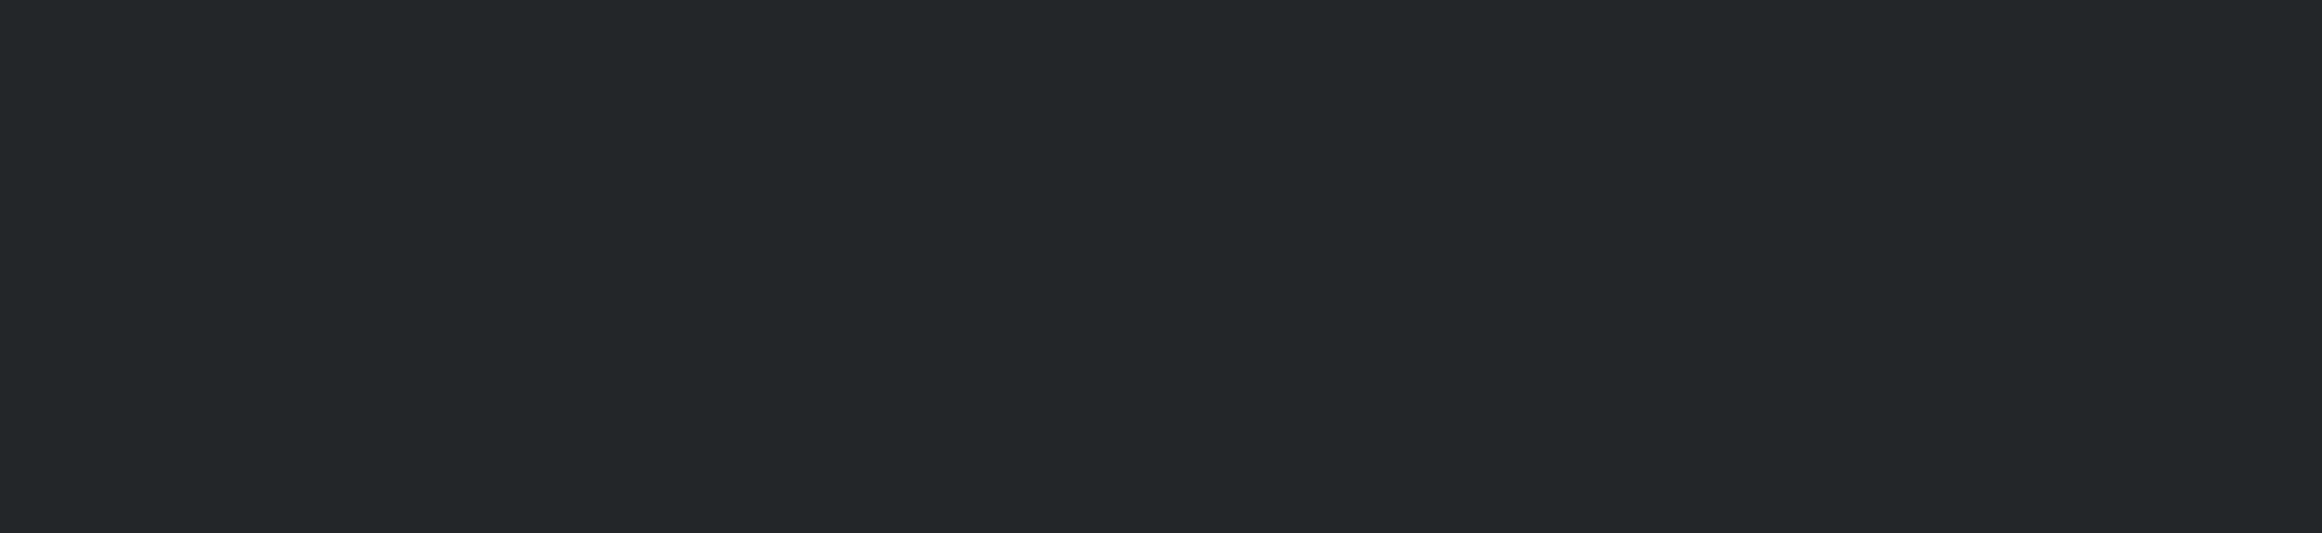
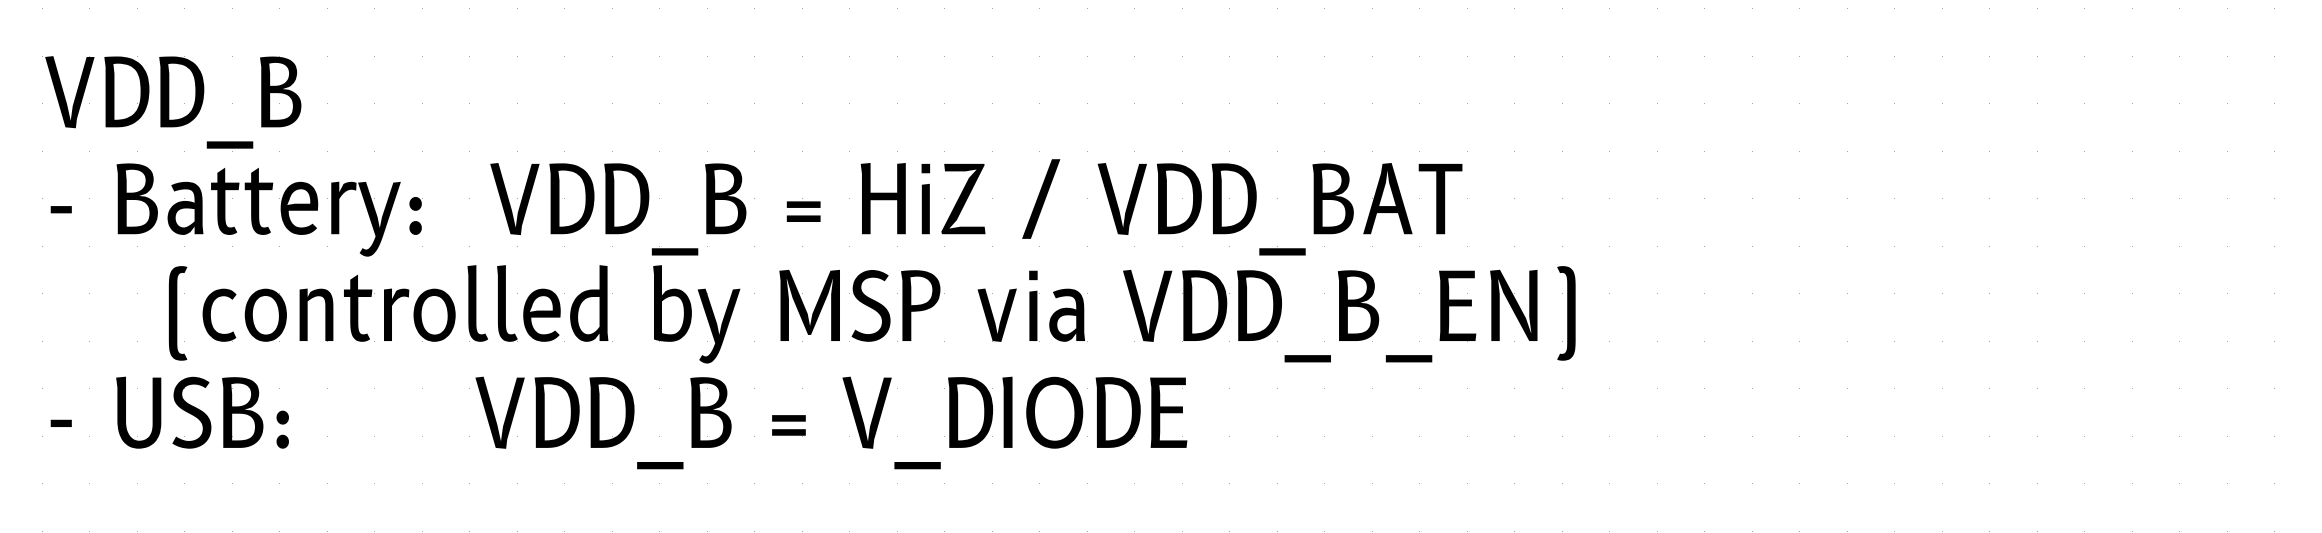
text: none -> VDD_B (173, 102)
text: none -> - Battery: VDD_B = HiZ / VDD_BAT (756, 207)
text: none -> (controlled by MSP via VDD_B_EN) (872, 314)
text: none -> - USB: VDD_B = V_DIODE (619, 422)

